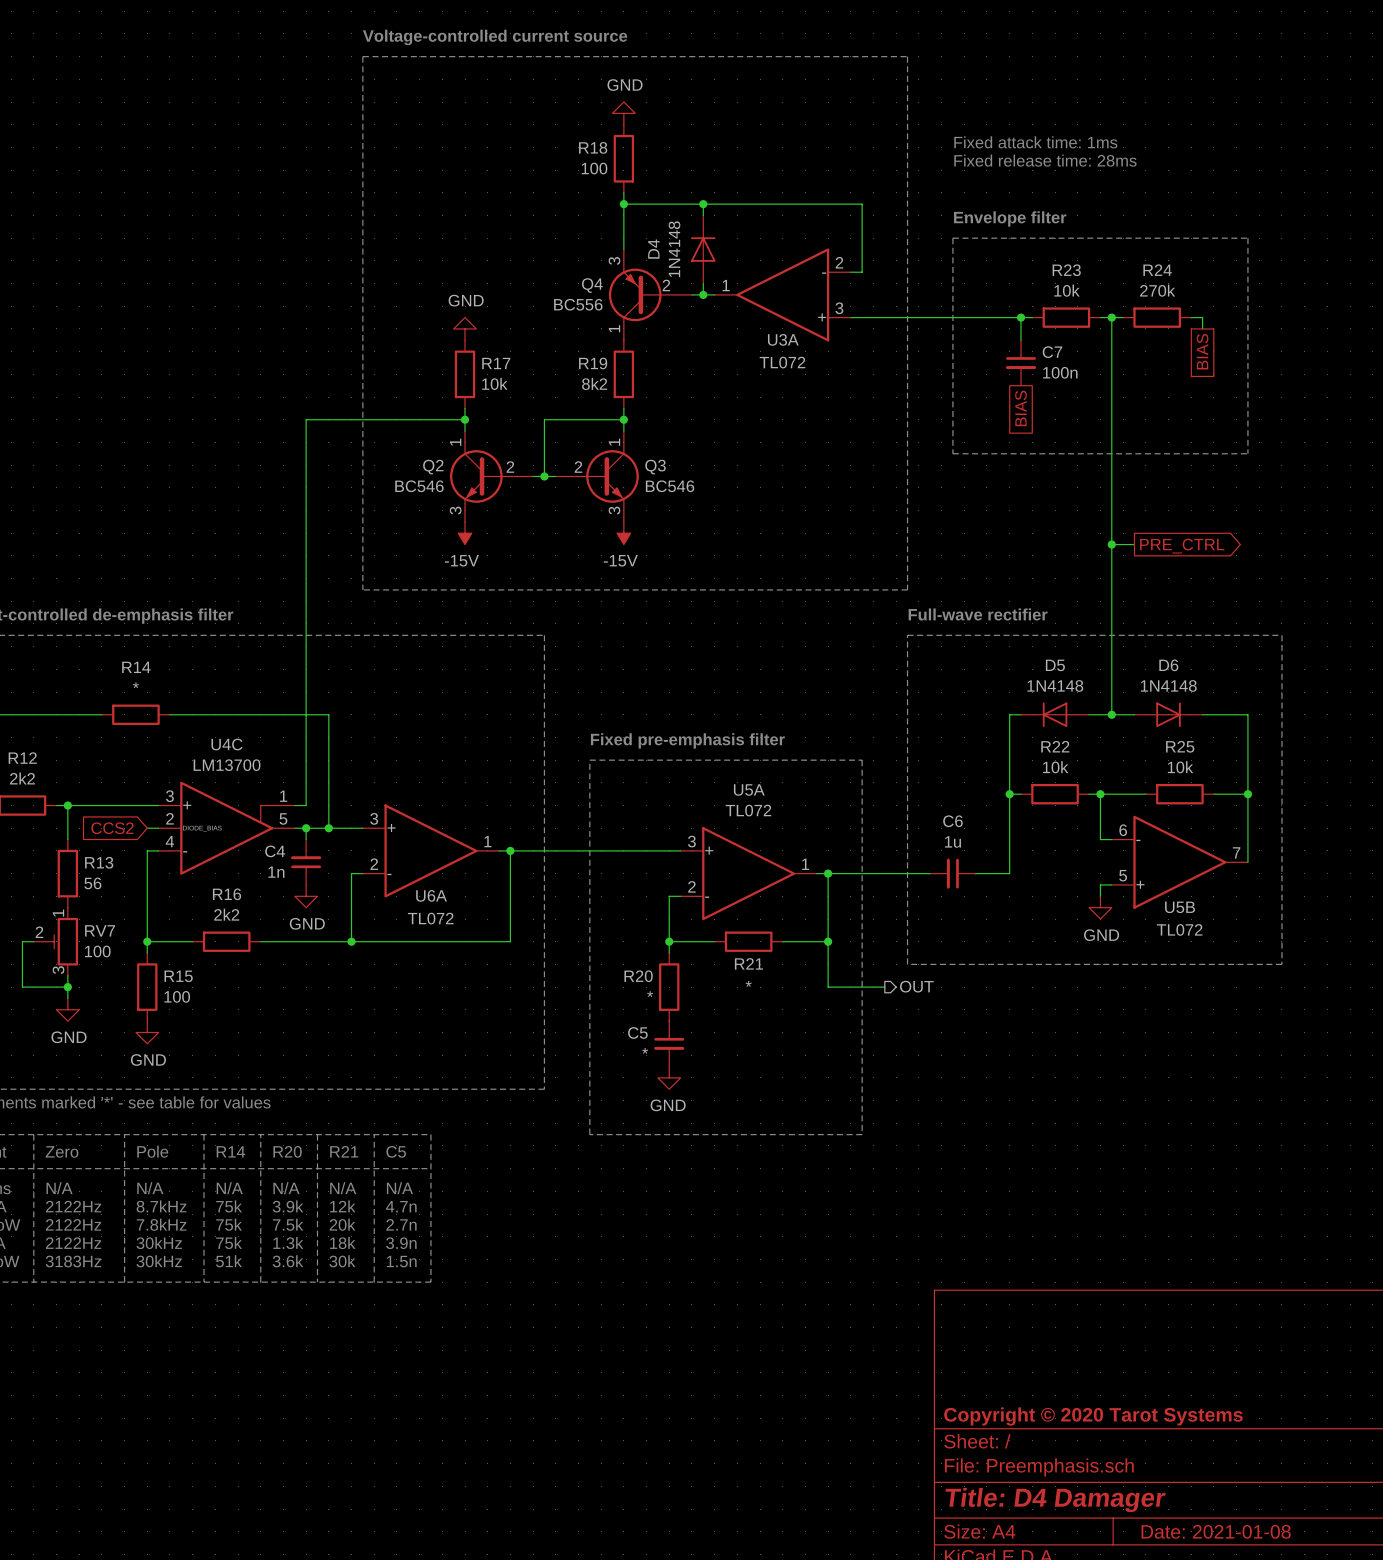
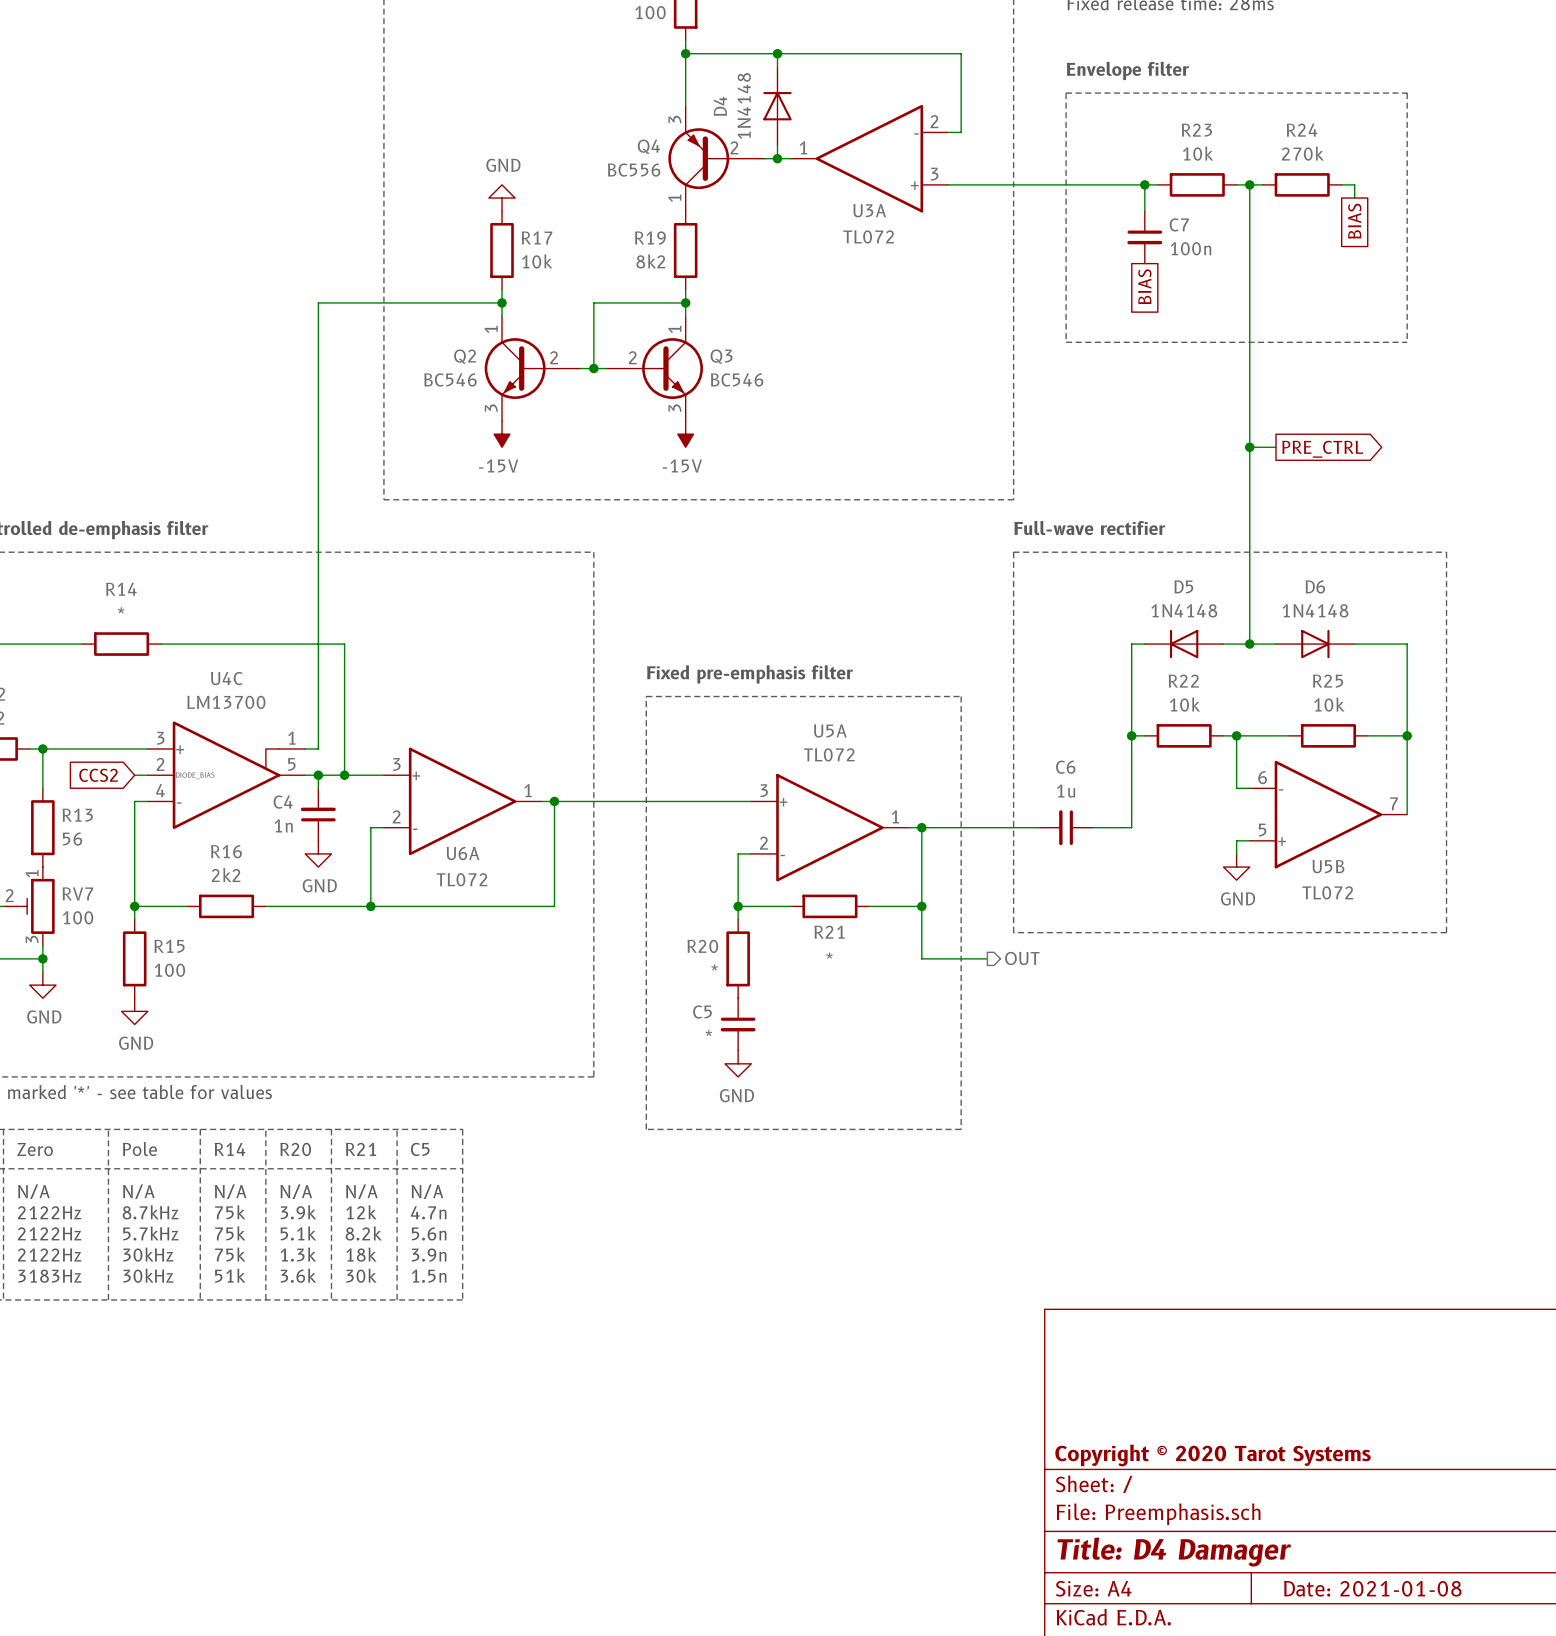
text: 7.8kHz (161, 1224) -> 5.7kHz (150, 1233)
text: 7.5k (288, 1224) -> 5.1k (298, 1233)
text: 20k (342, 1224) -> 8.2k (363, 1233)
text: 2.7n (401, 1224) -> 5.6n (429, 1233)

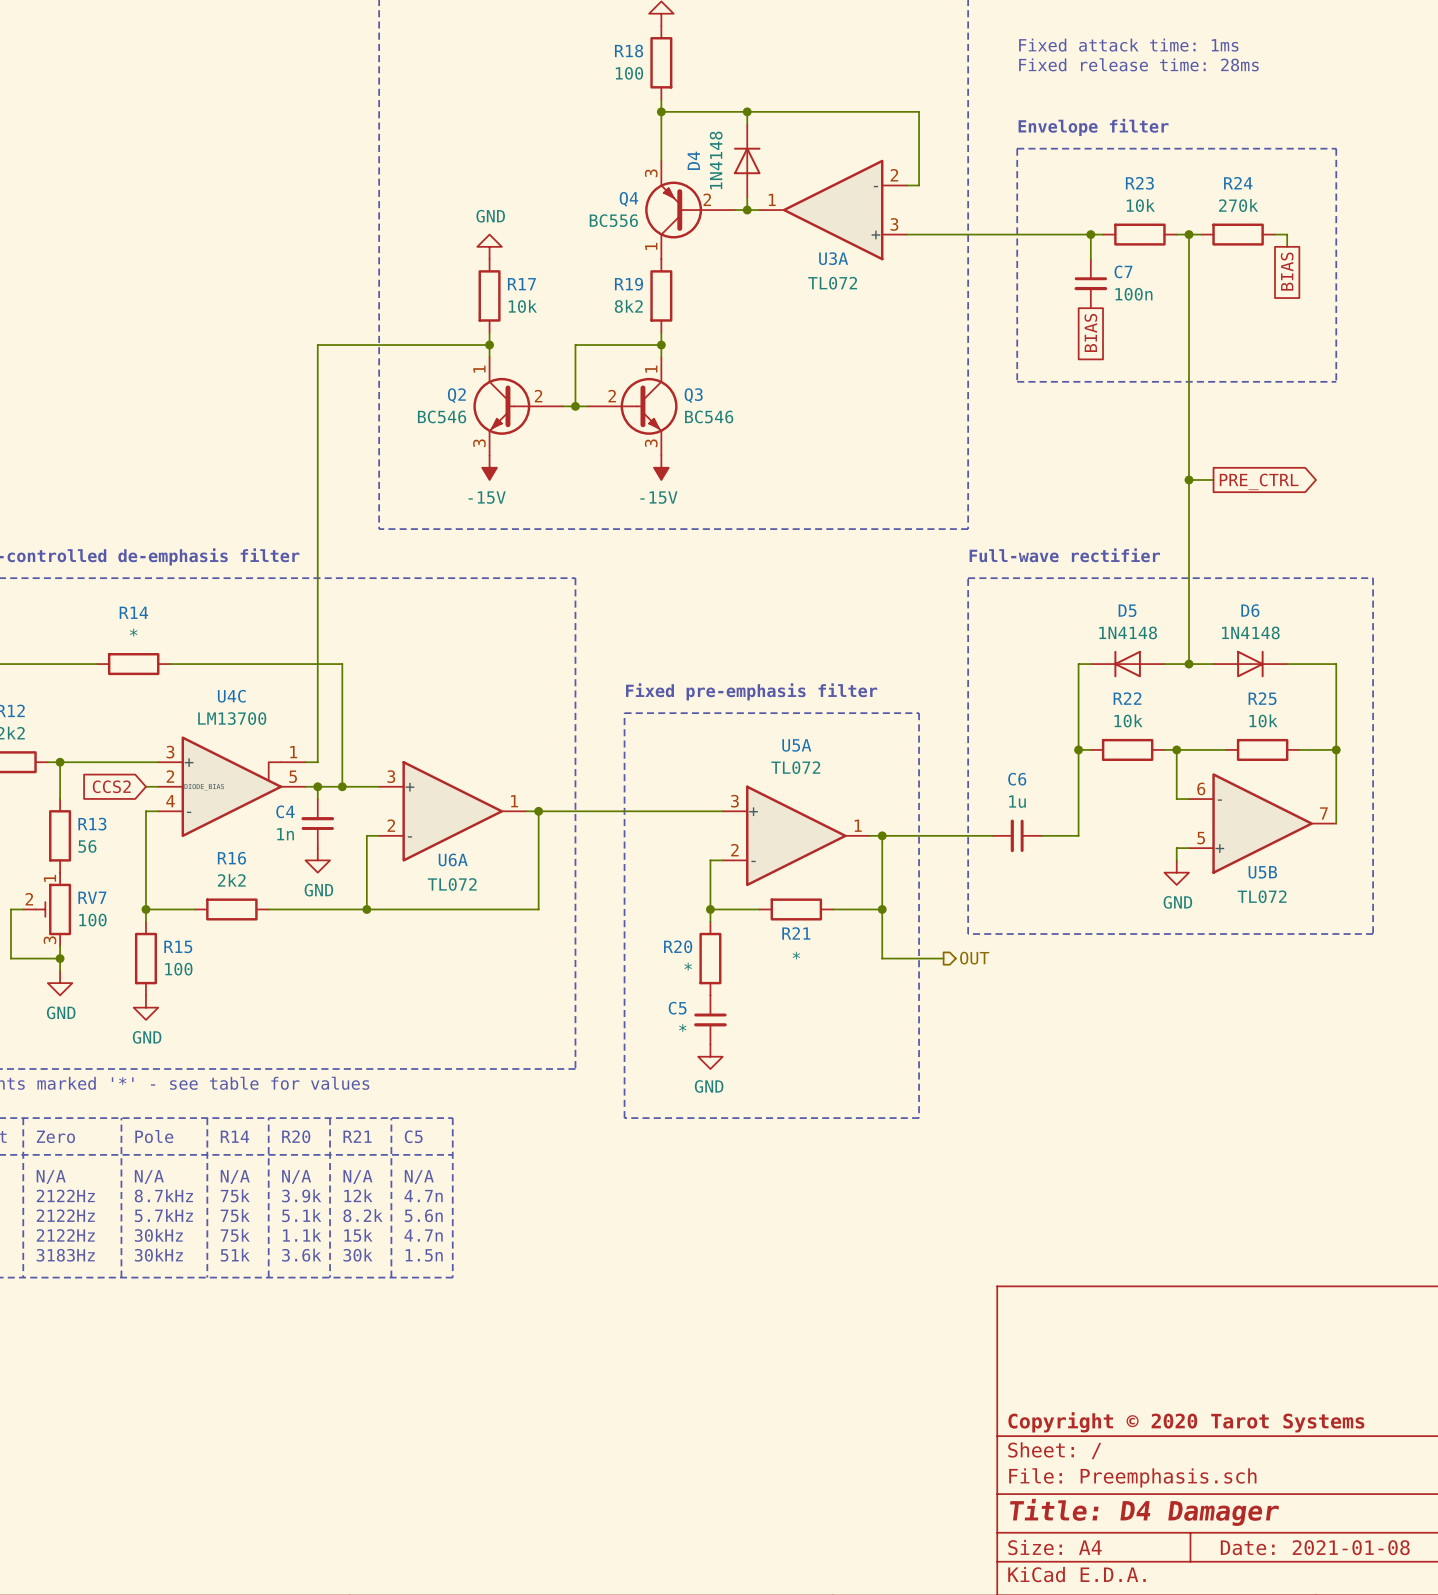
text: 1.3k (298, 1254) -> 1.1k (302, 1235)
text: 18k (361, 1254) -> 15k (358, 1235)
text: 3.9n (429, 1255) -> 4.7n (423, 1235)

